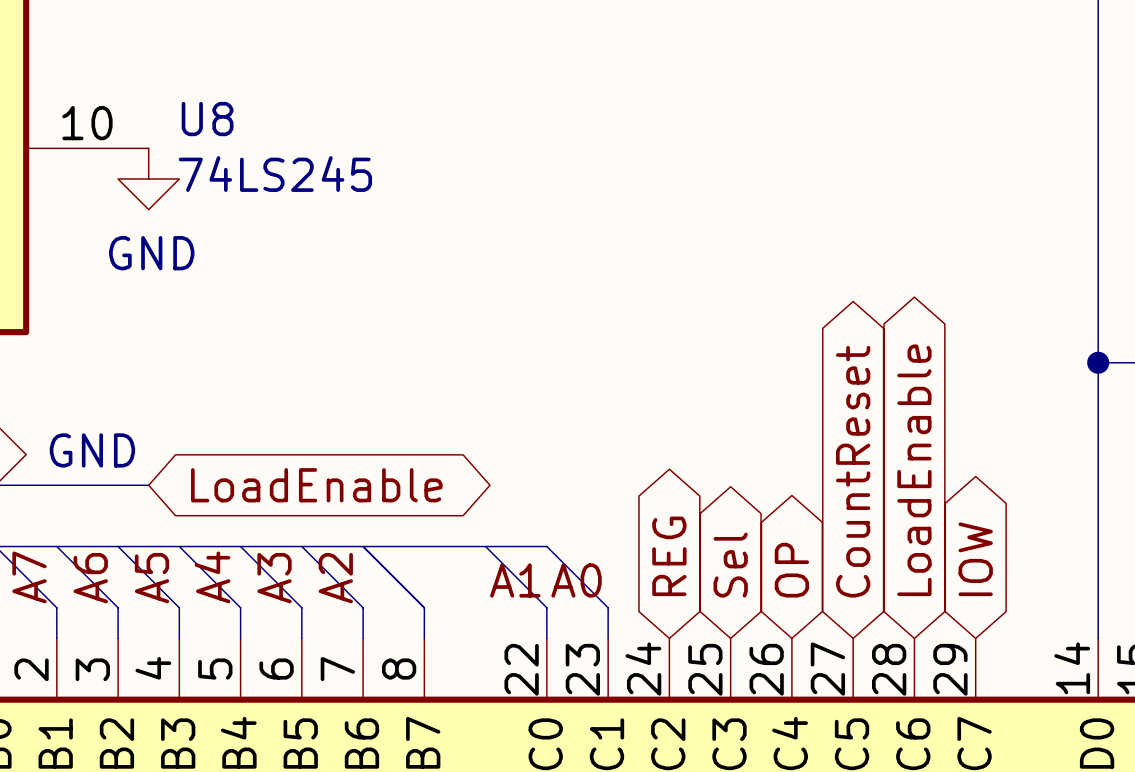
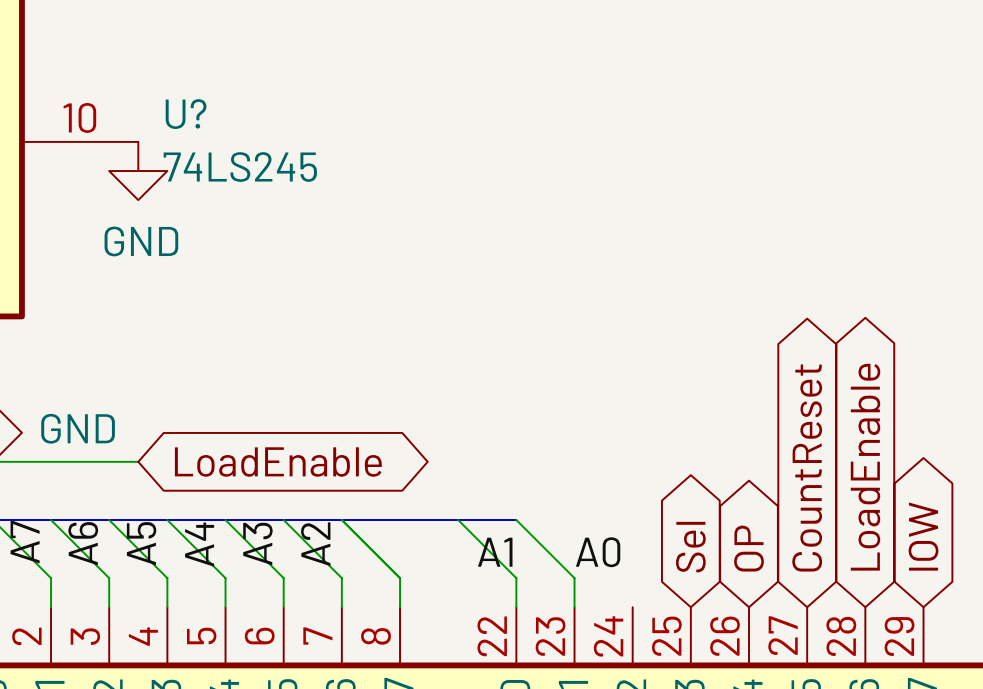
U8 name: U8 (207, 119) -> U? (186, 114)
global label: REG (669, 556) -> none
label position: A0 (576, 580) -> A0 (598, 552)

